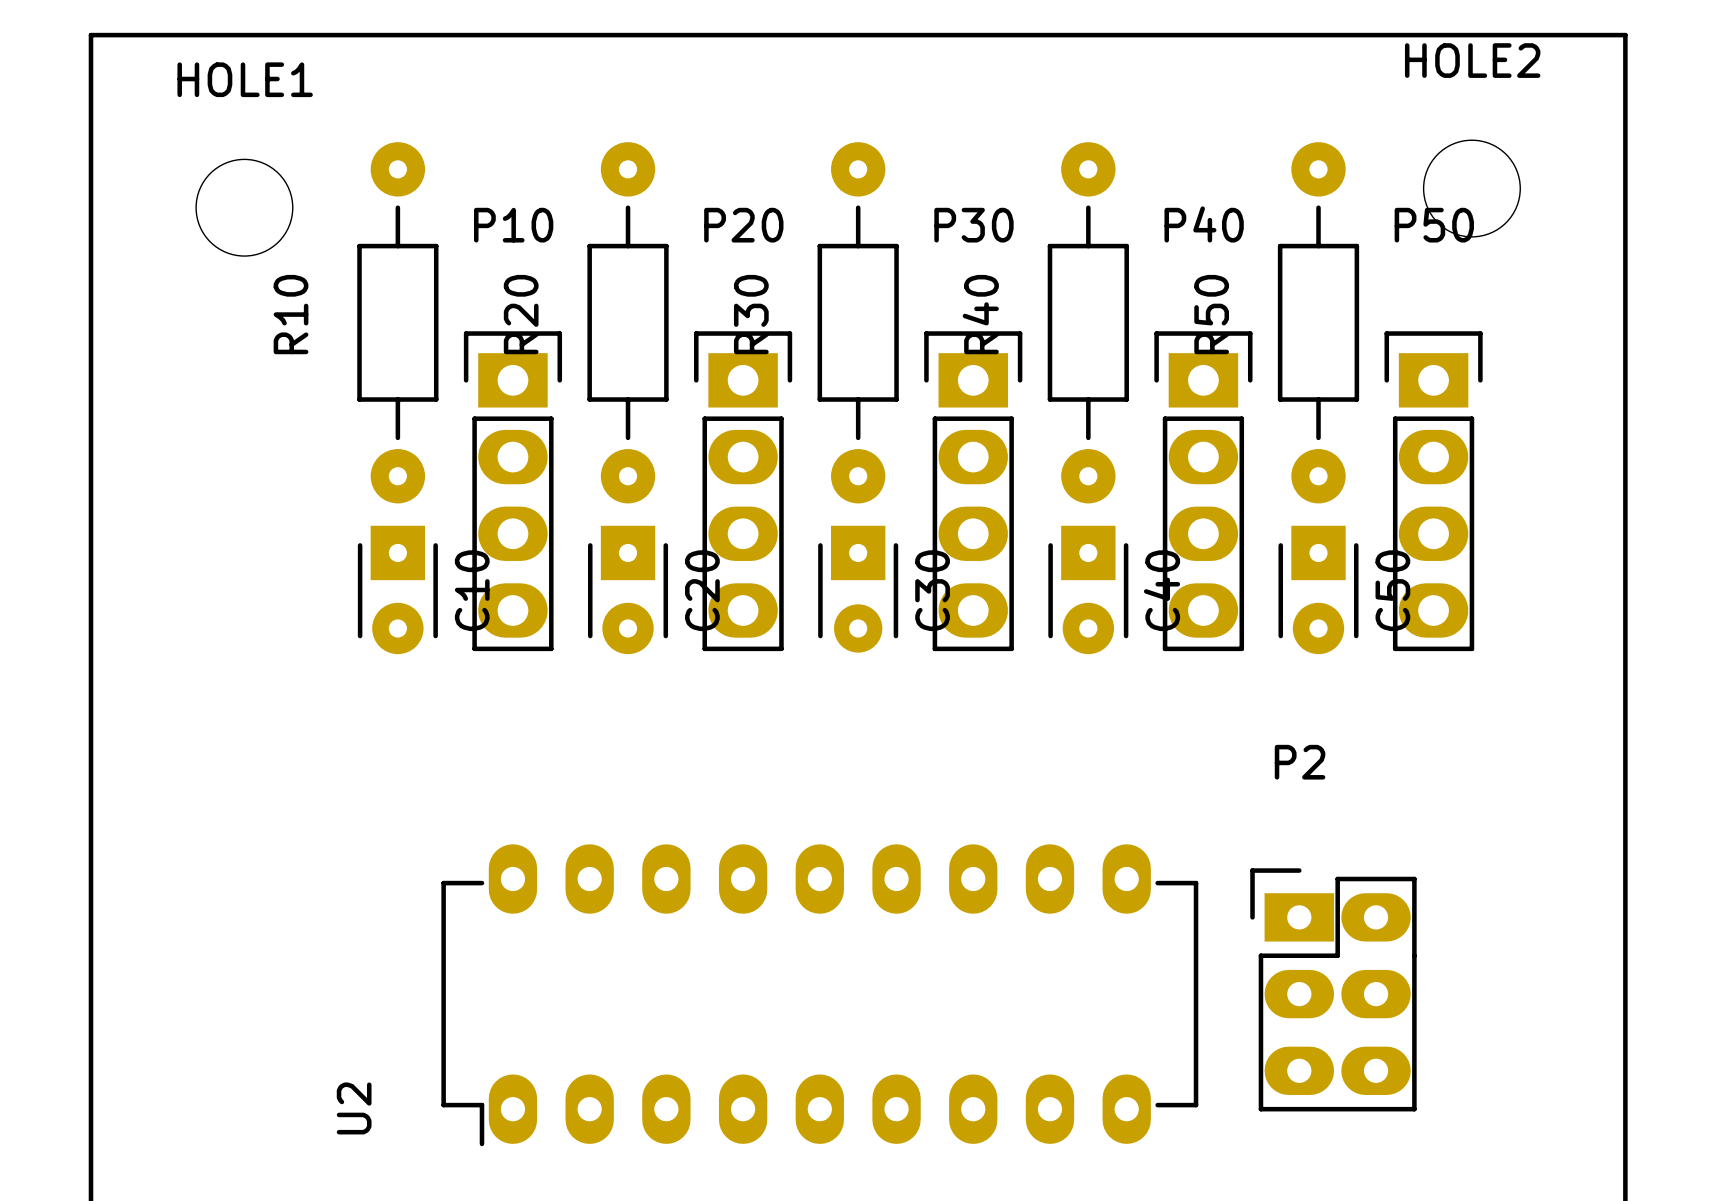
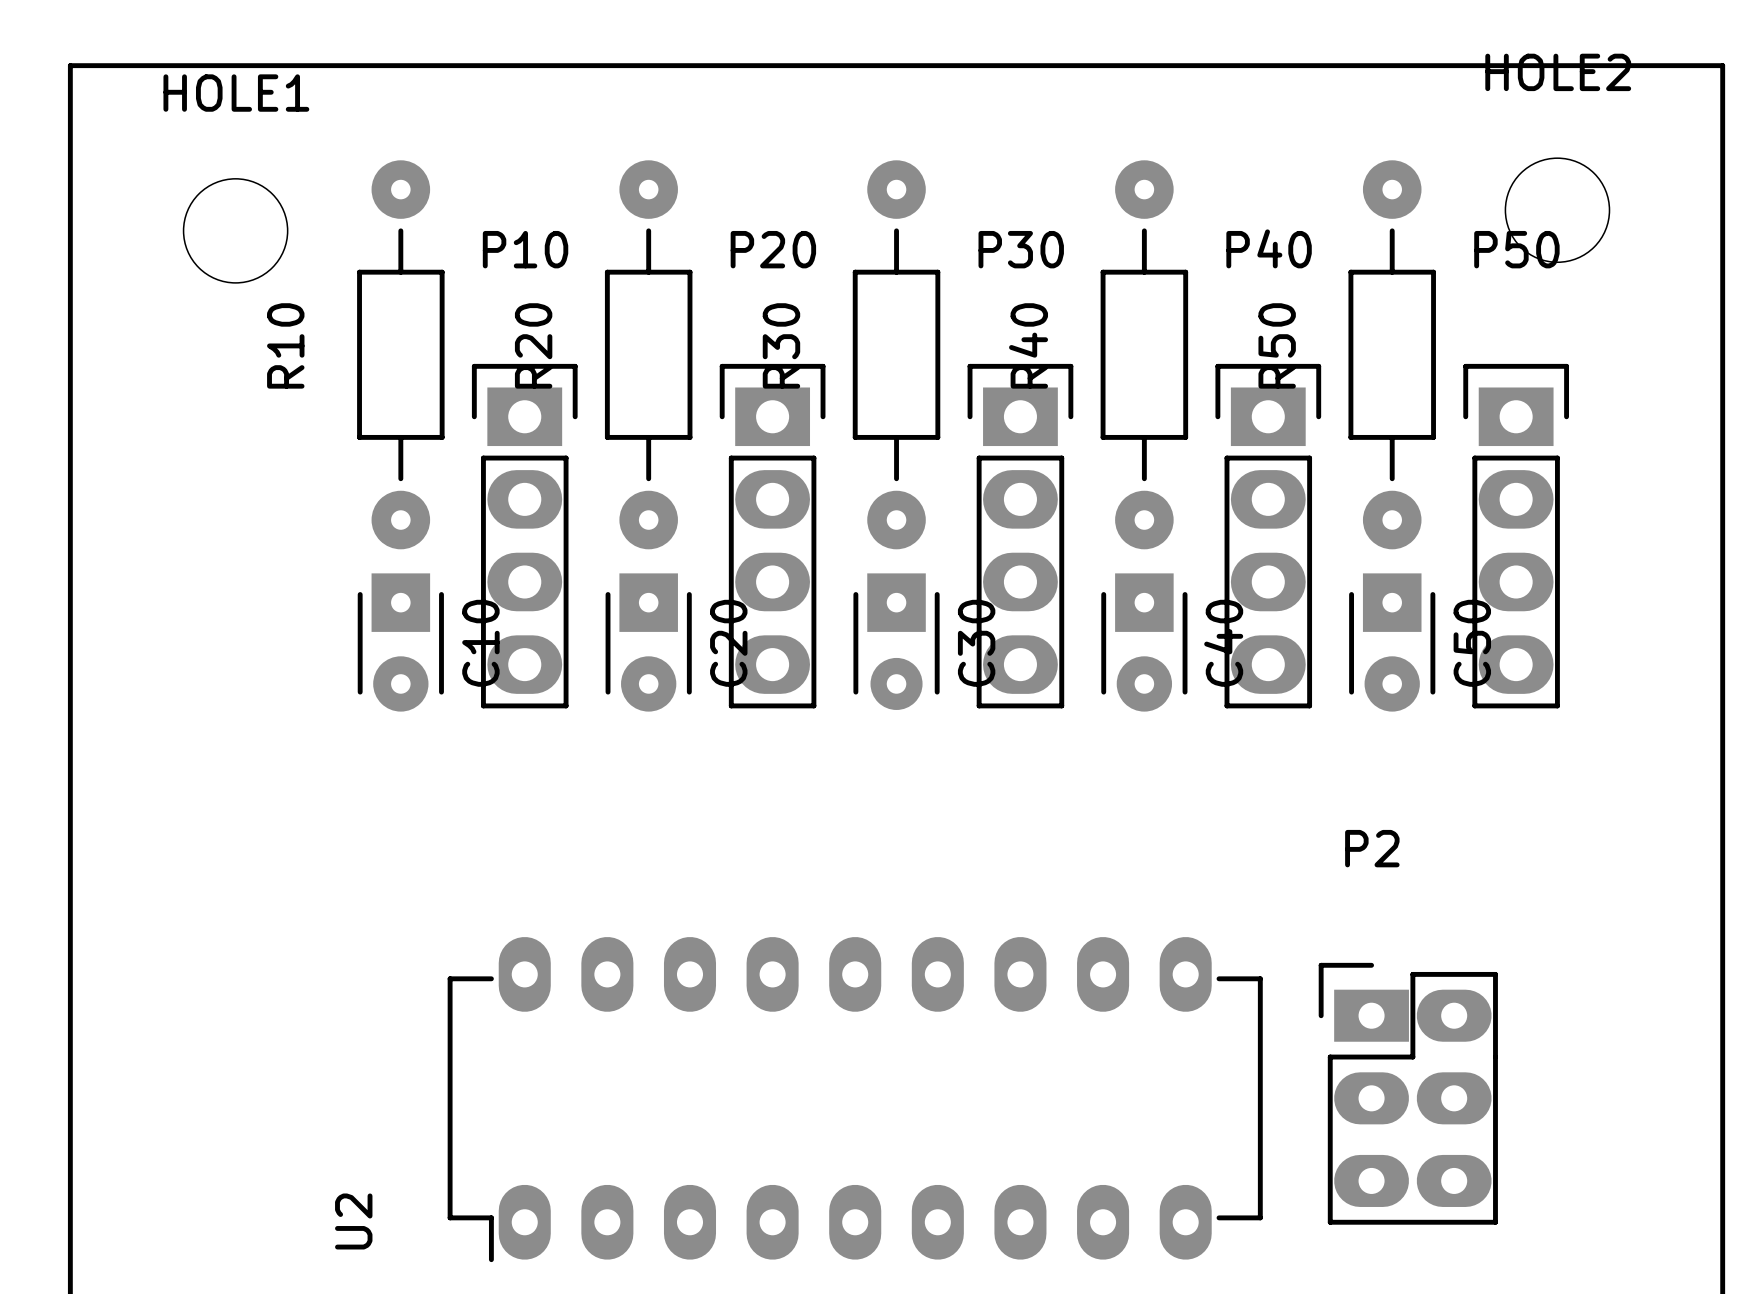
board edge: (90, 54) (90, 35) (1625, 35) (1625, 54) -> (70, 65) (1722, 65)
P2 position: (1333, 989) -> (1408, 1093)
U2 position: (819, 995) -> (855, 1099)

